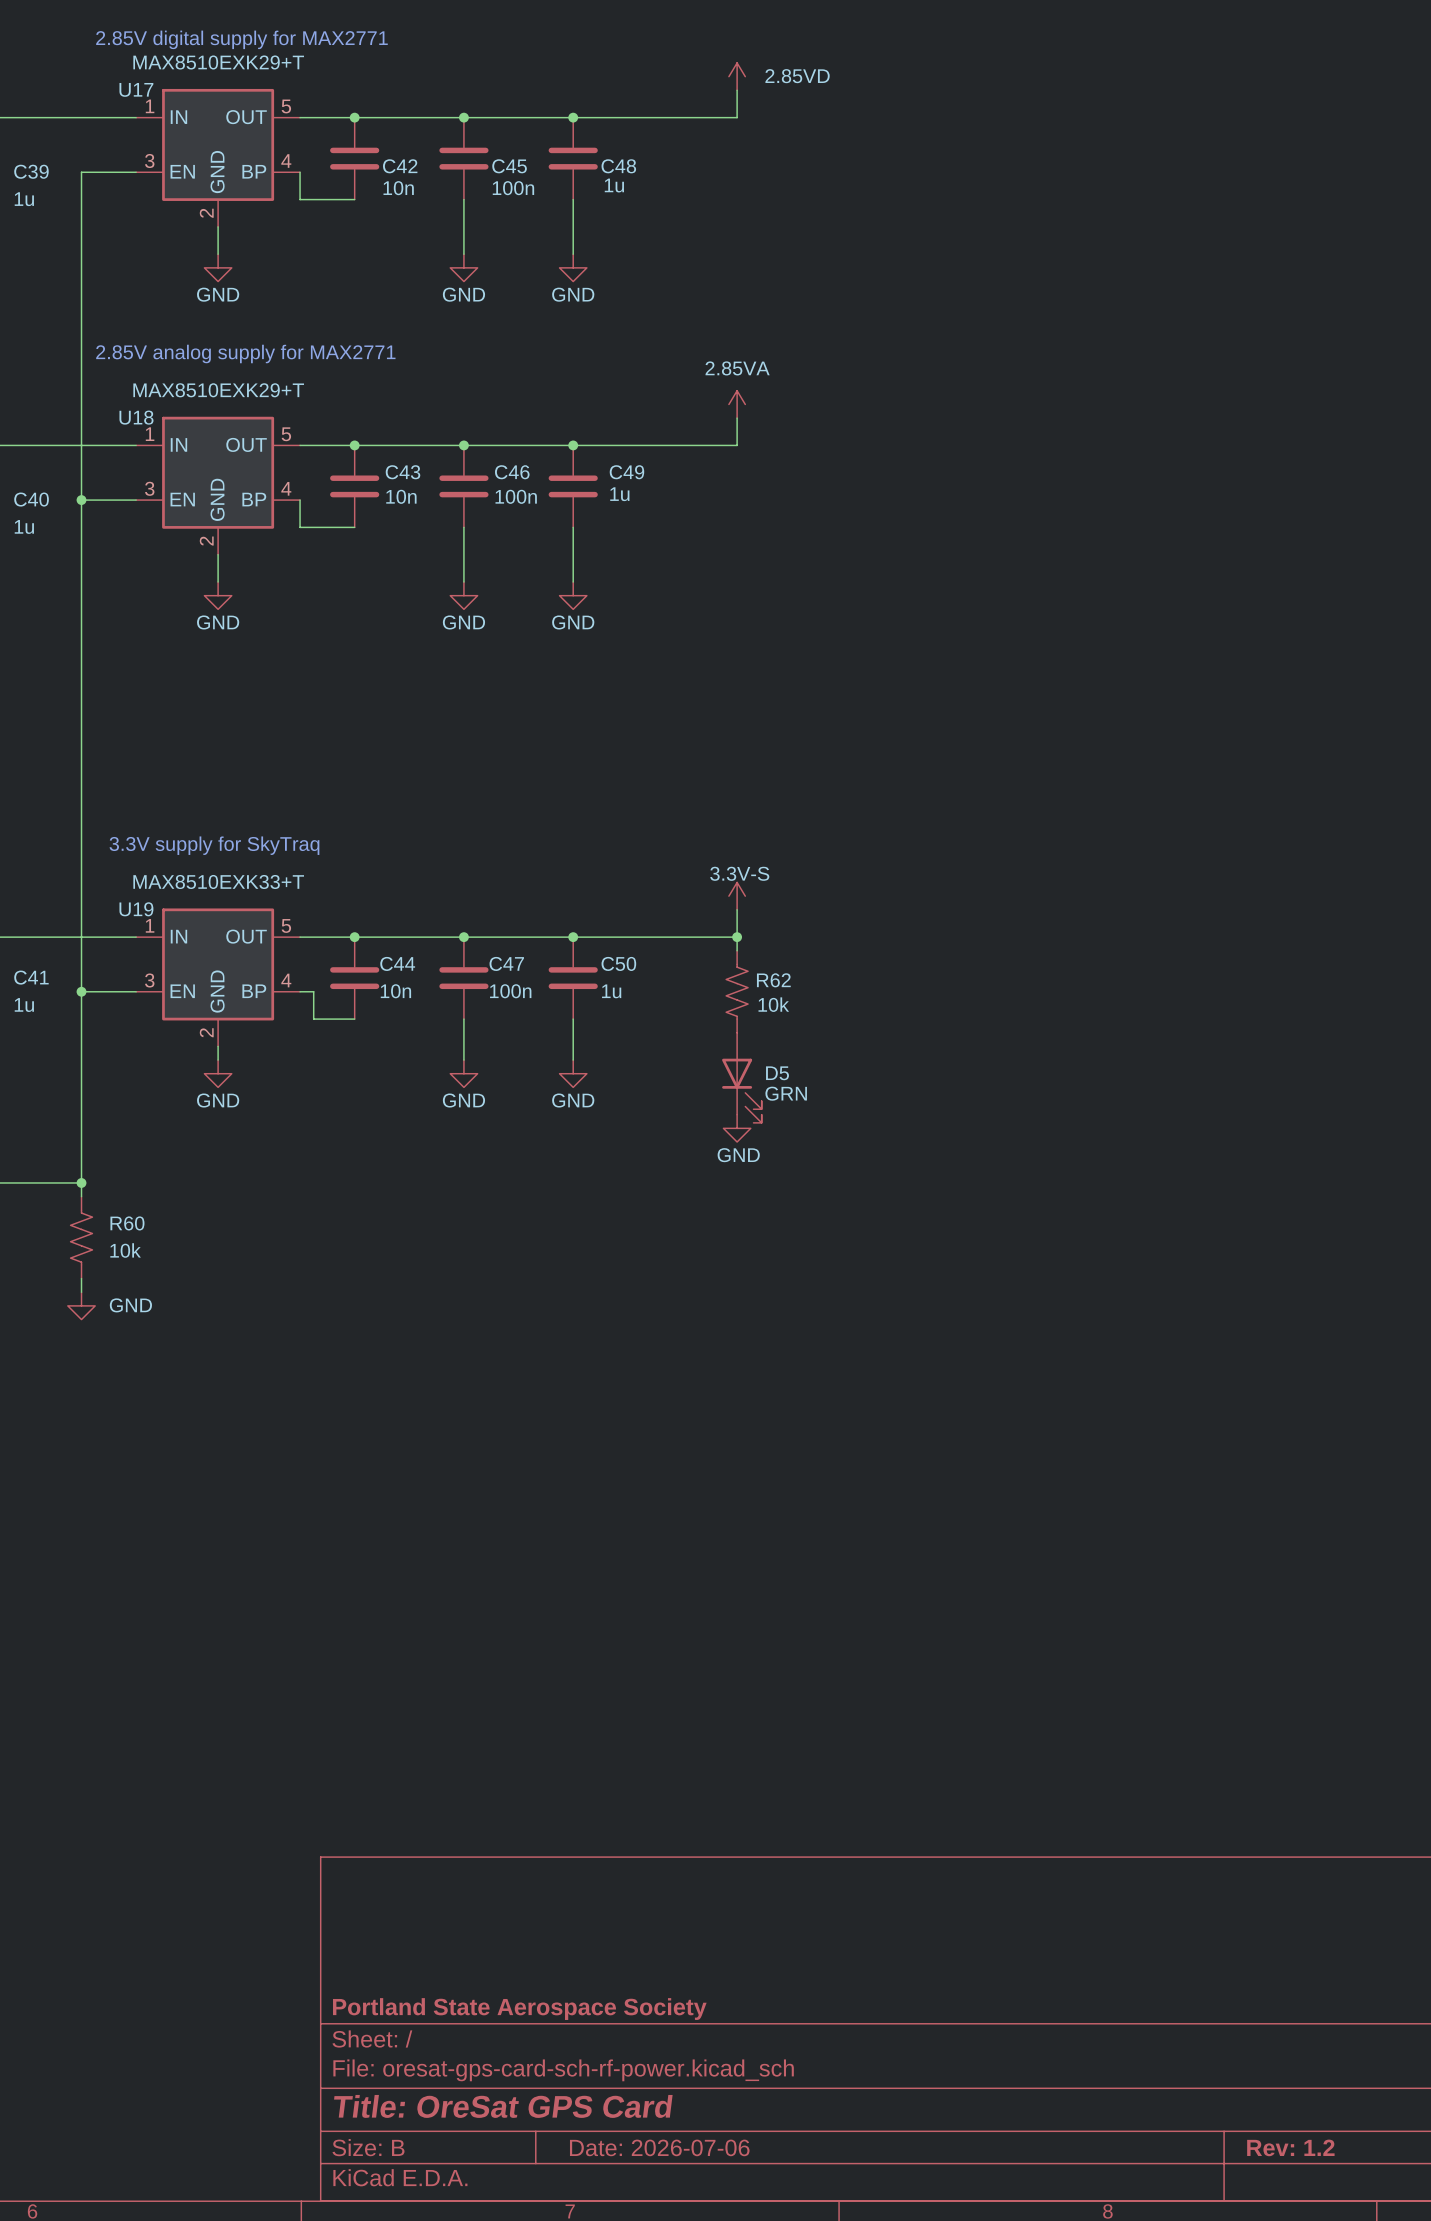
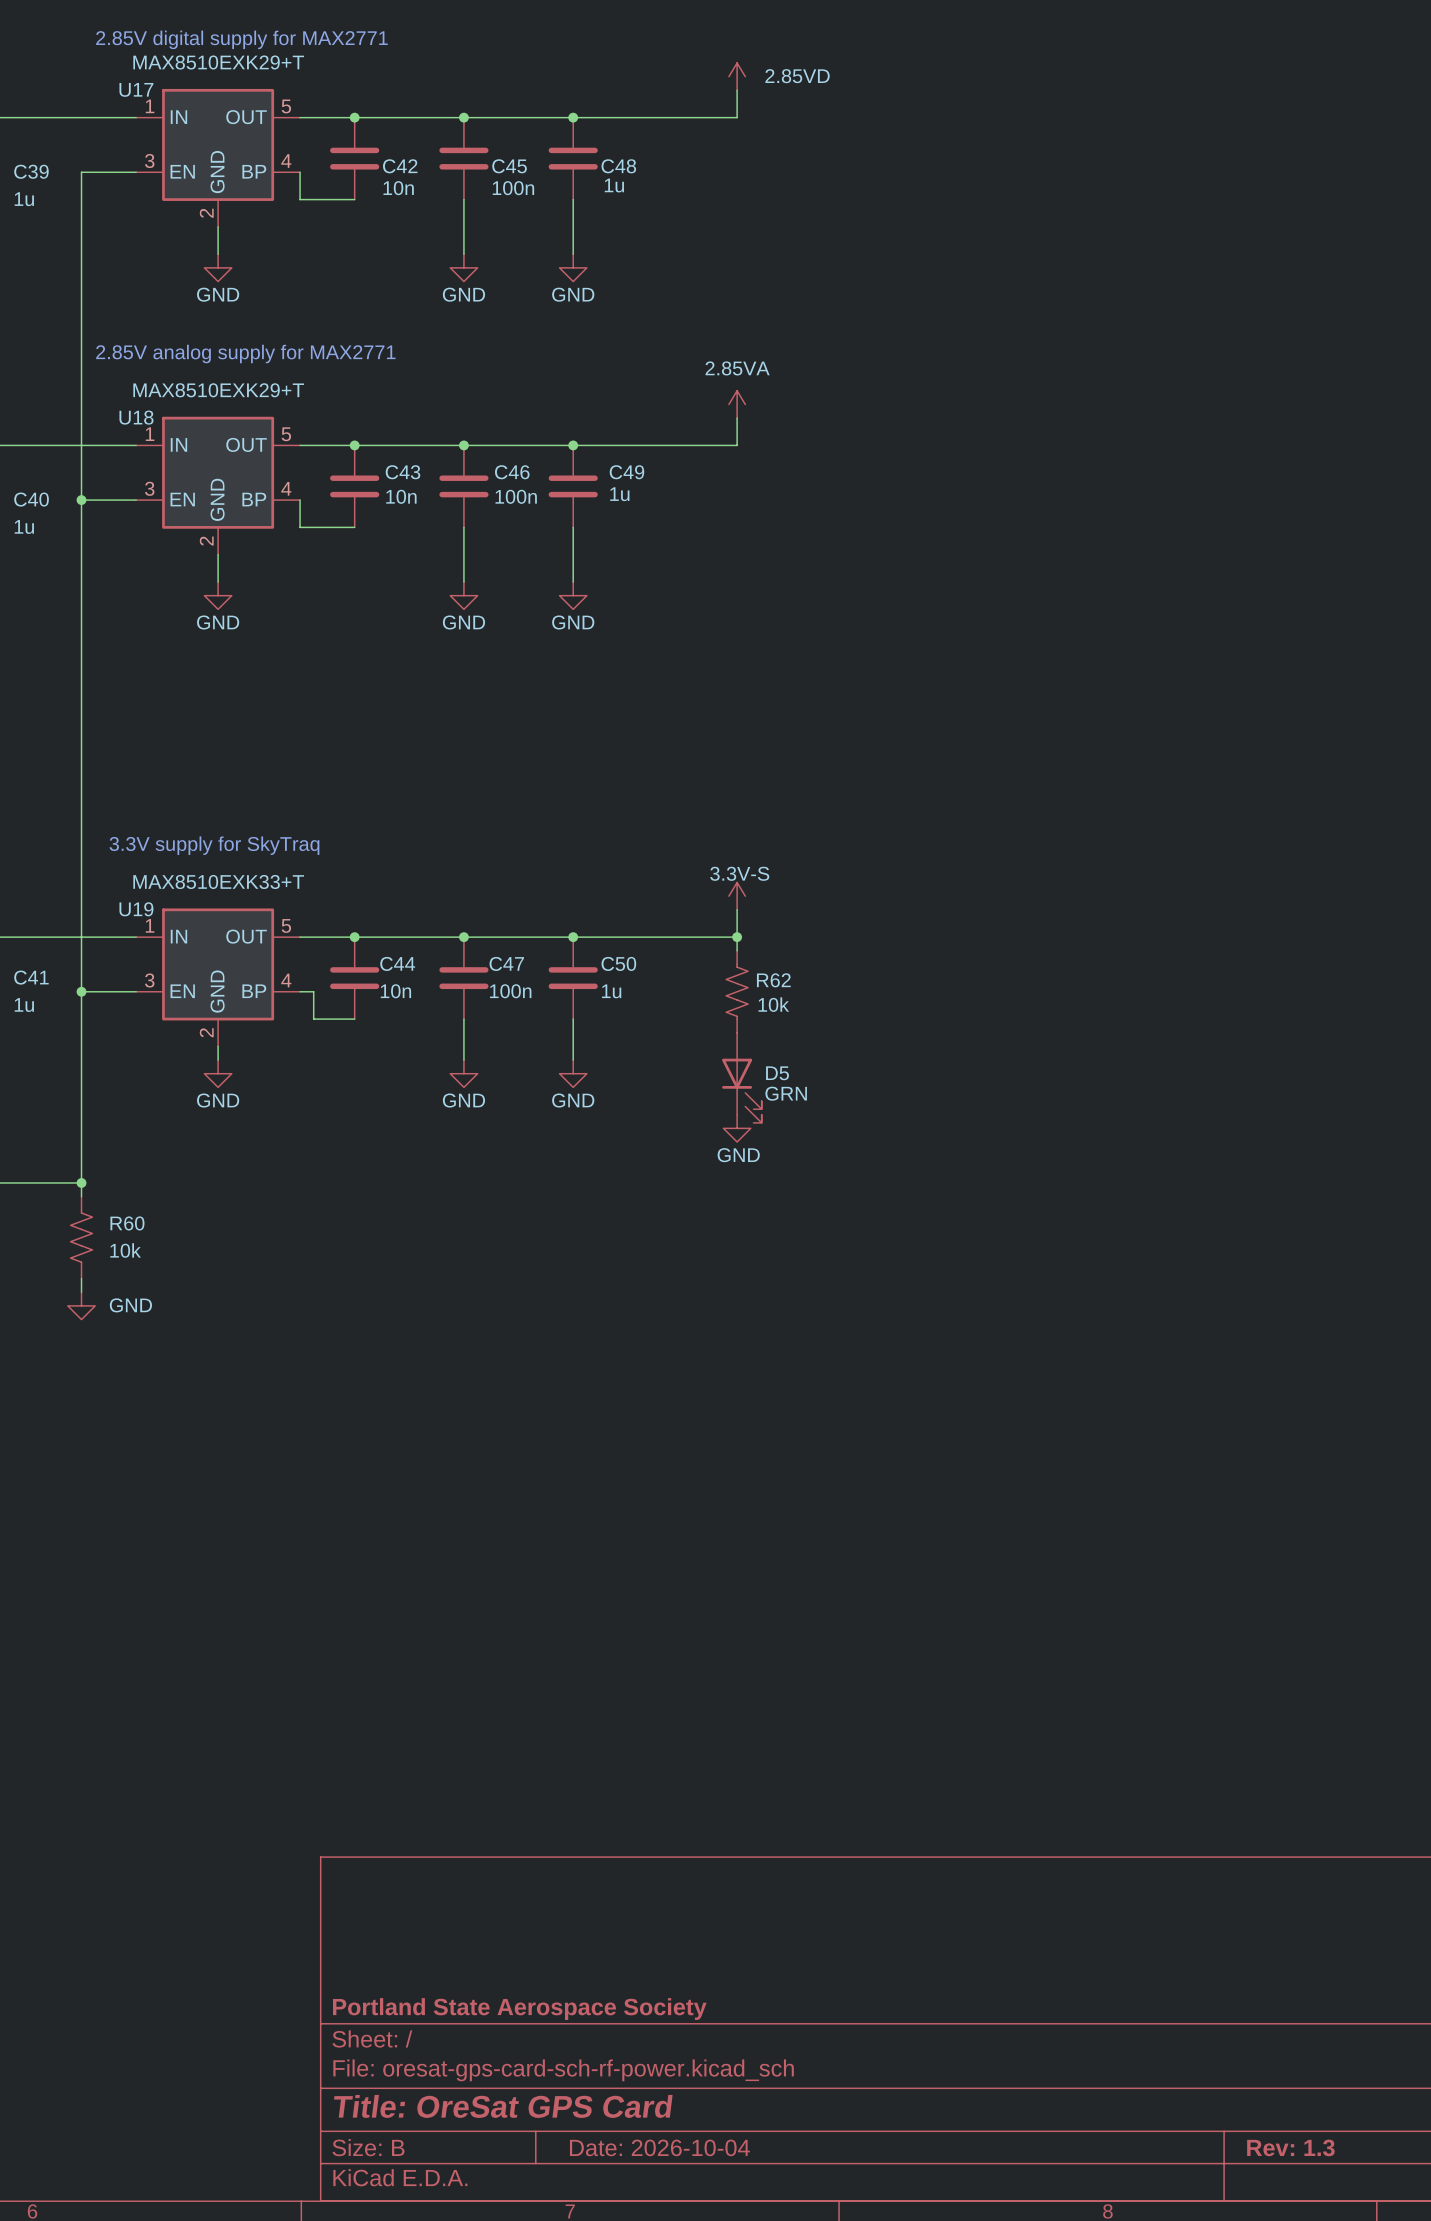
title block: Date: 2026-07-06 (659, 2147) -> Date: 2026-10-04 (659, 2147)
title block: Rev: 1.2 (1290, 2147) -> Rev: 1.3 (1290, 2147)

